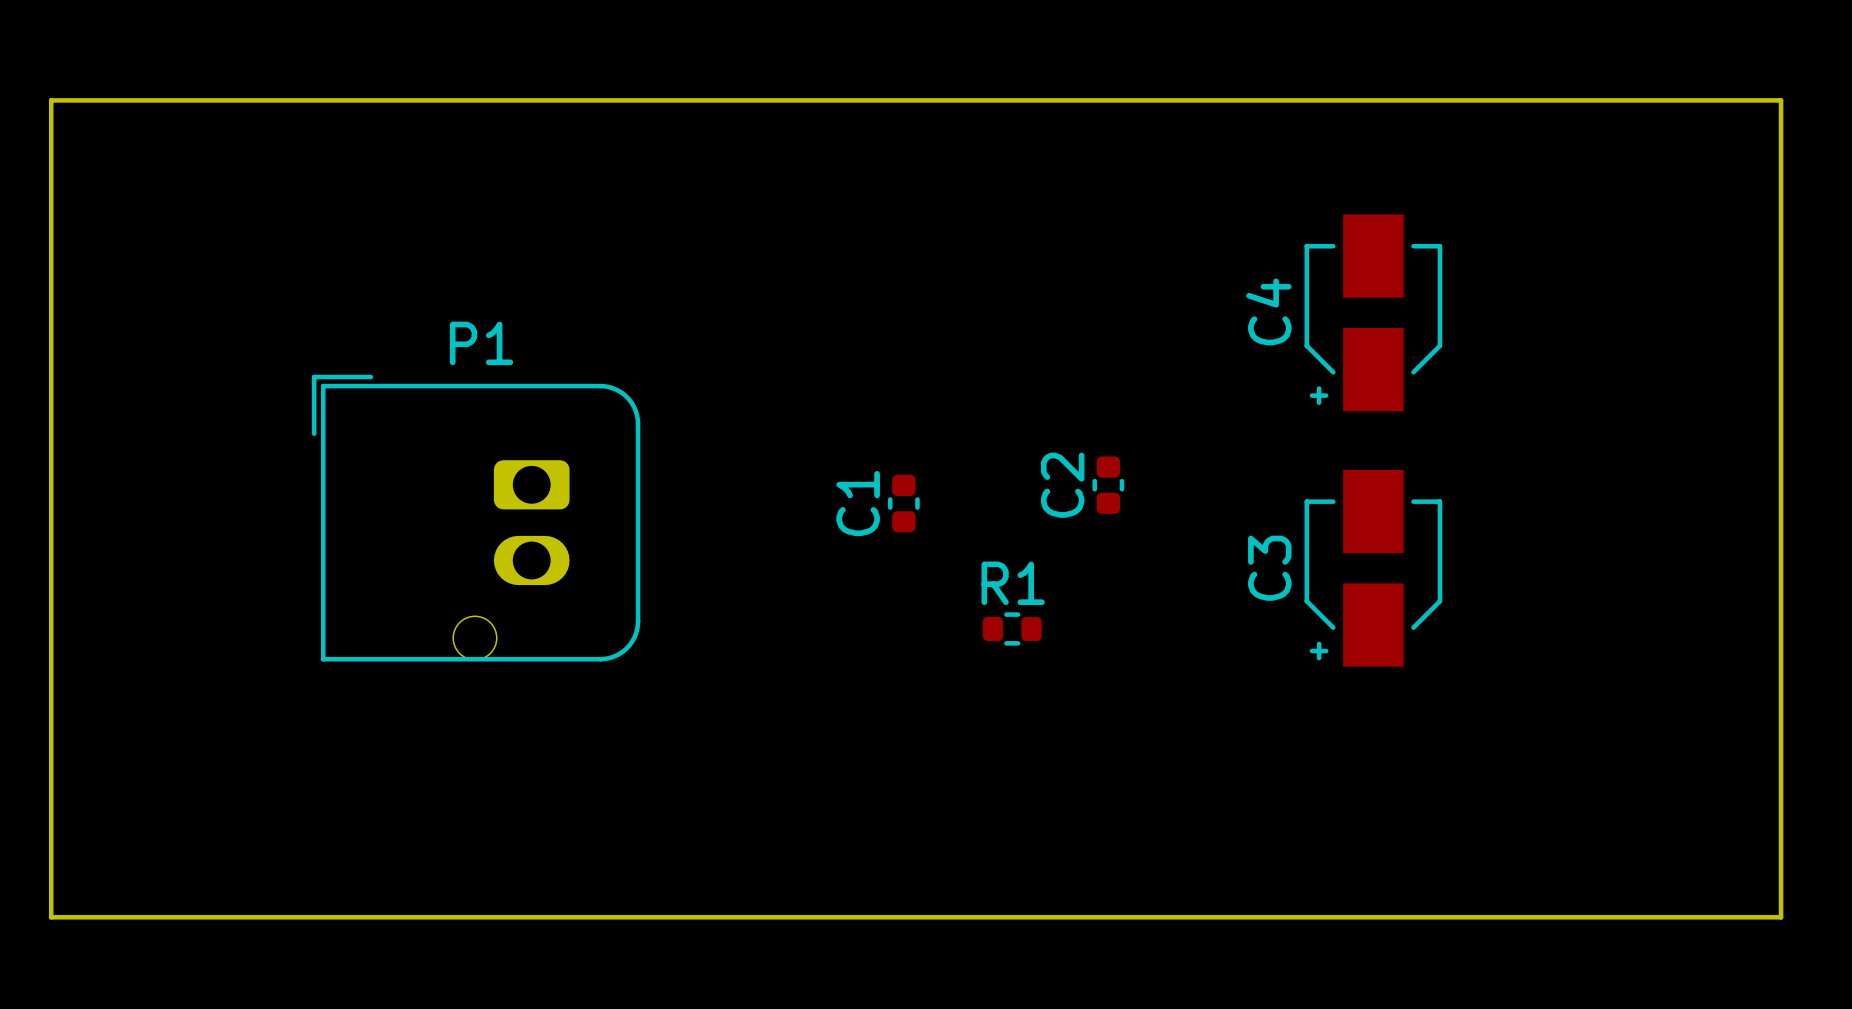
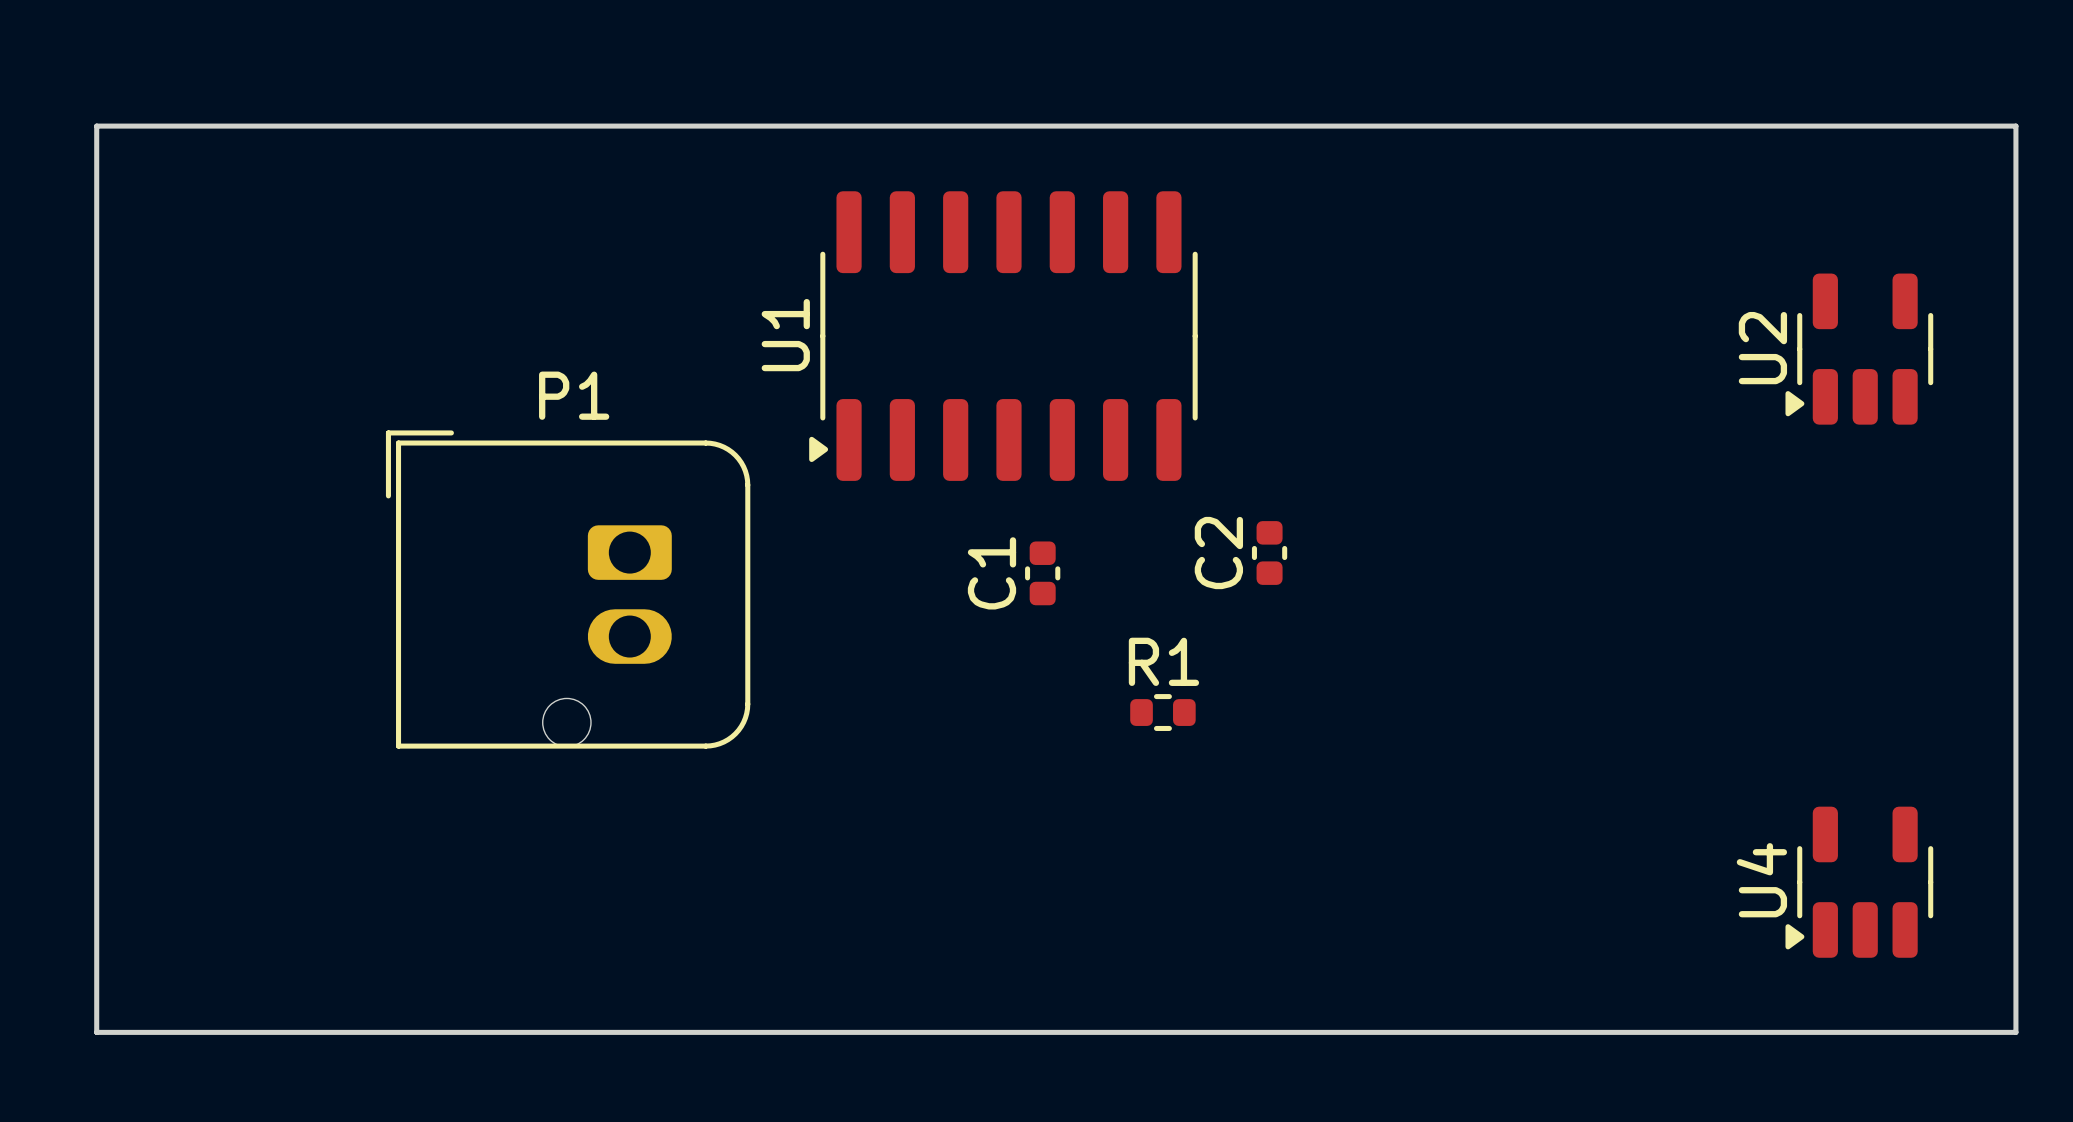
U1: none -> (1003, 336)
U2: none -> (1859, 349)
C4: (1373, 312) -> none
C3: (1373, 568) -> none
U4: none -> (1859, 882)

